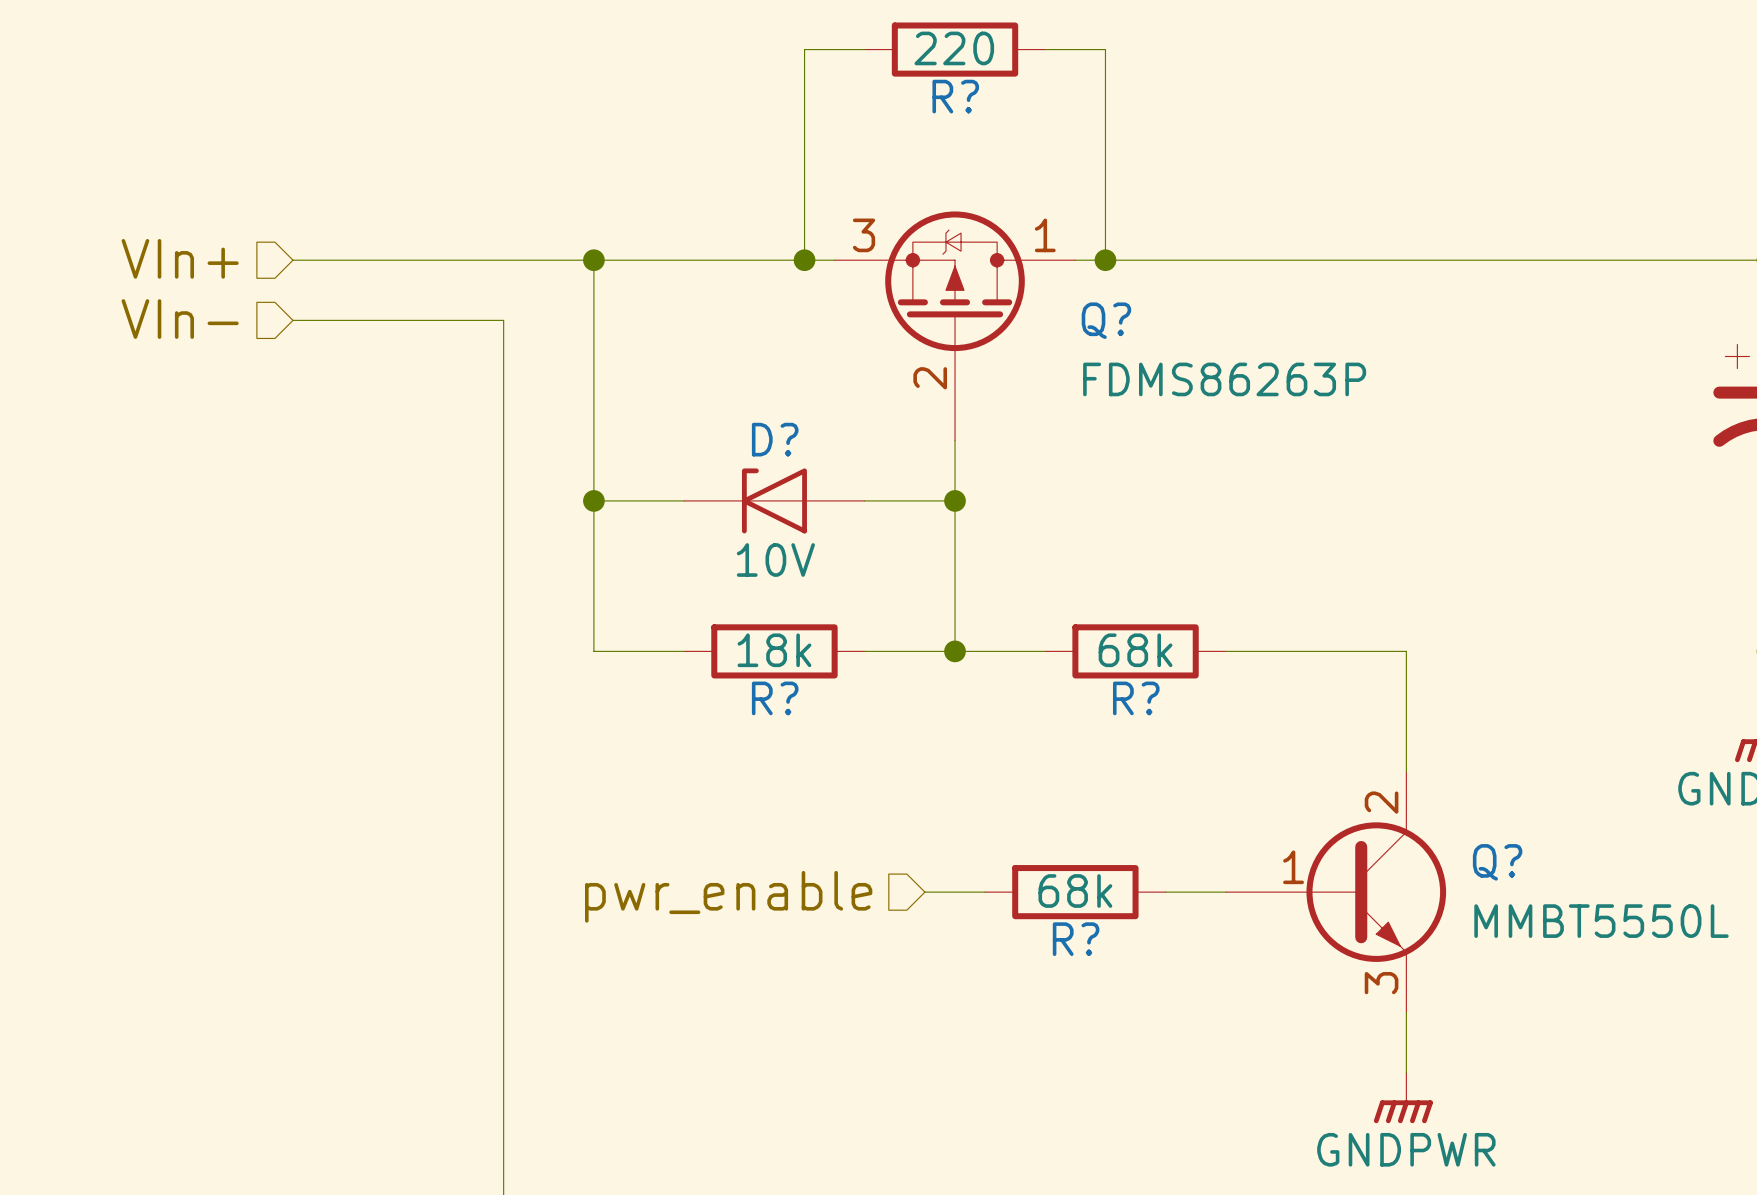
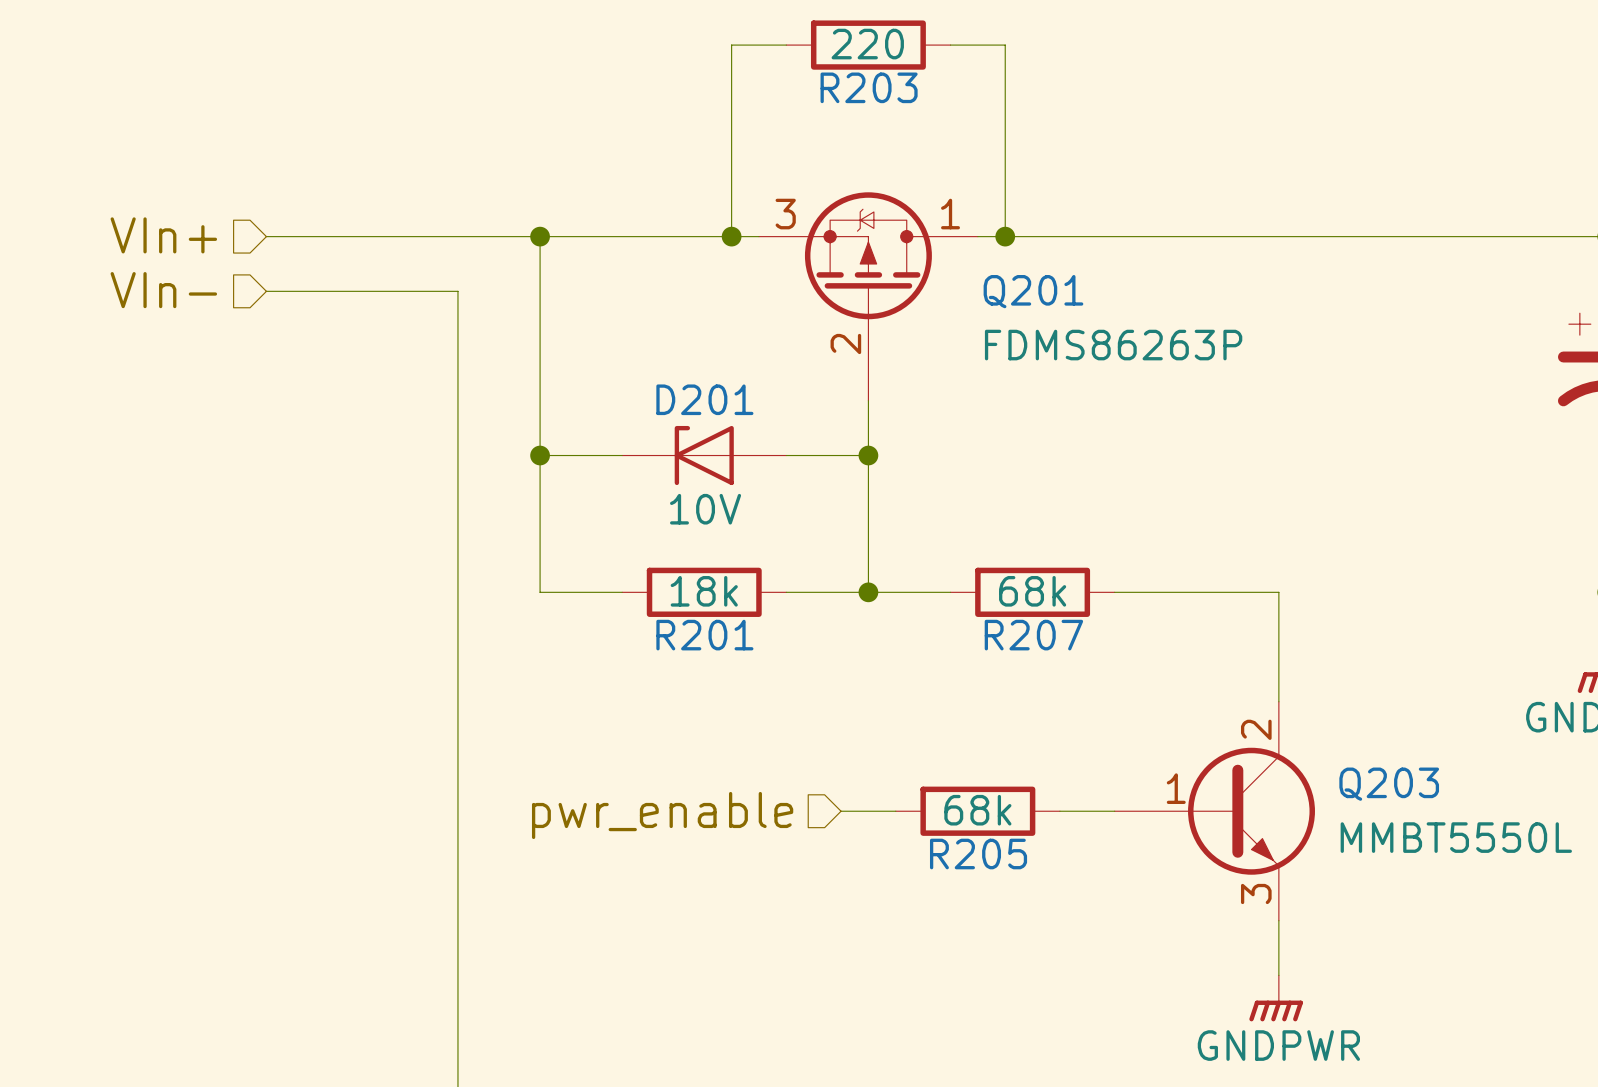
R? name: R? (955, 96) -> R203 (869, 87)
Q? name: Q? (1106, 320) -> Q201 (1033, 291)
D? name: D? (775, 439) -> D201 (704, 399)
R? name: R? (775, 698) -> R201 (704, 635)
R? name: R? (1136, 698) -> R207 (1033, 635)
Q? name: Q? (1497, 862) -> Q203 (1389, 784)
R? name: R? (1076, 939) -> R205 (978, 854)

